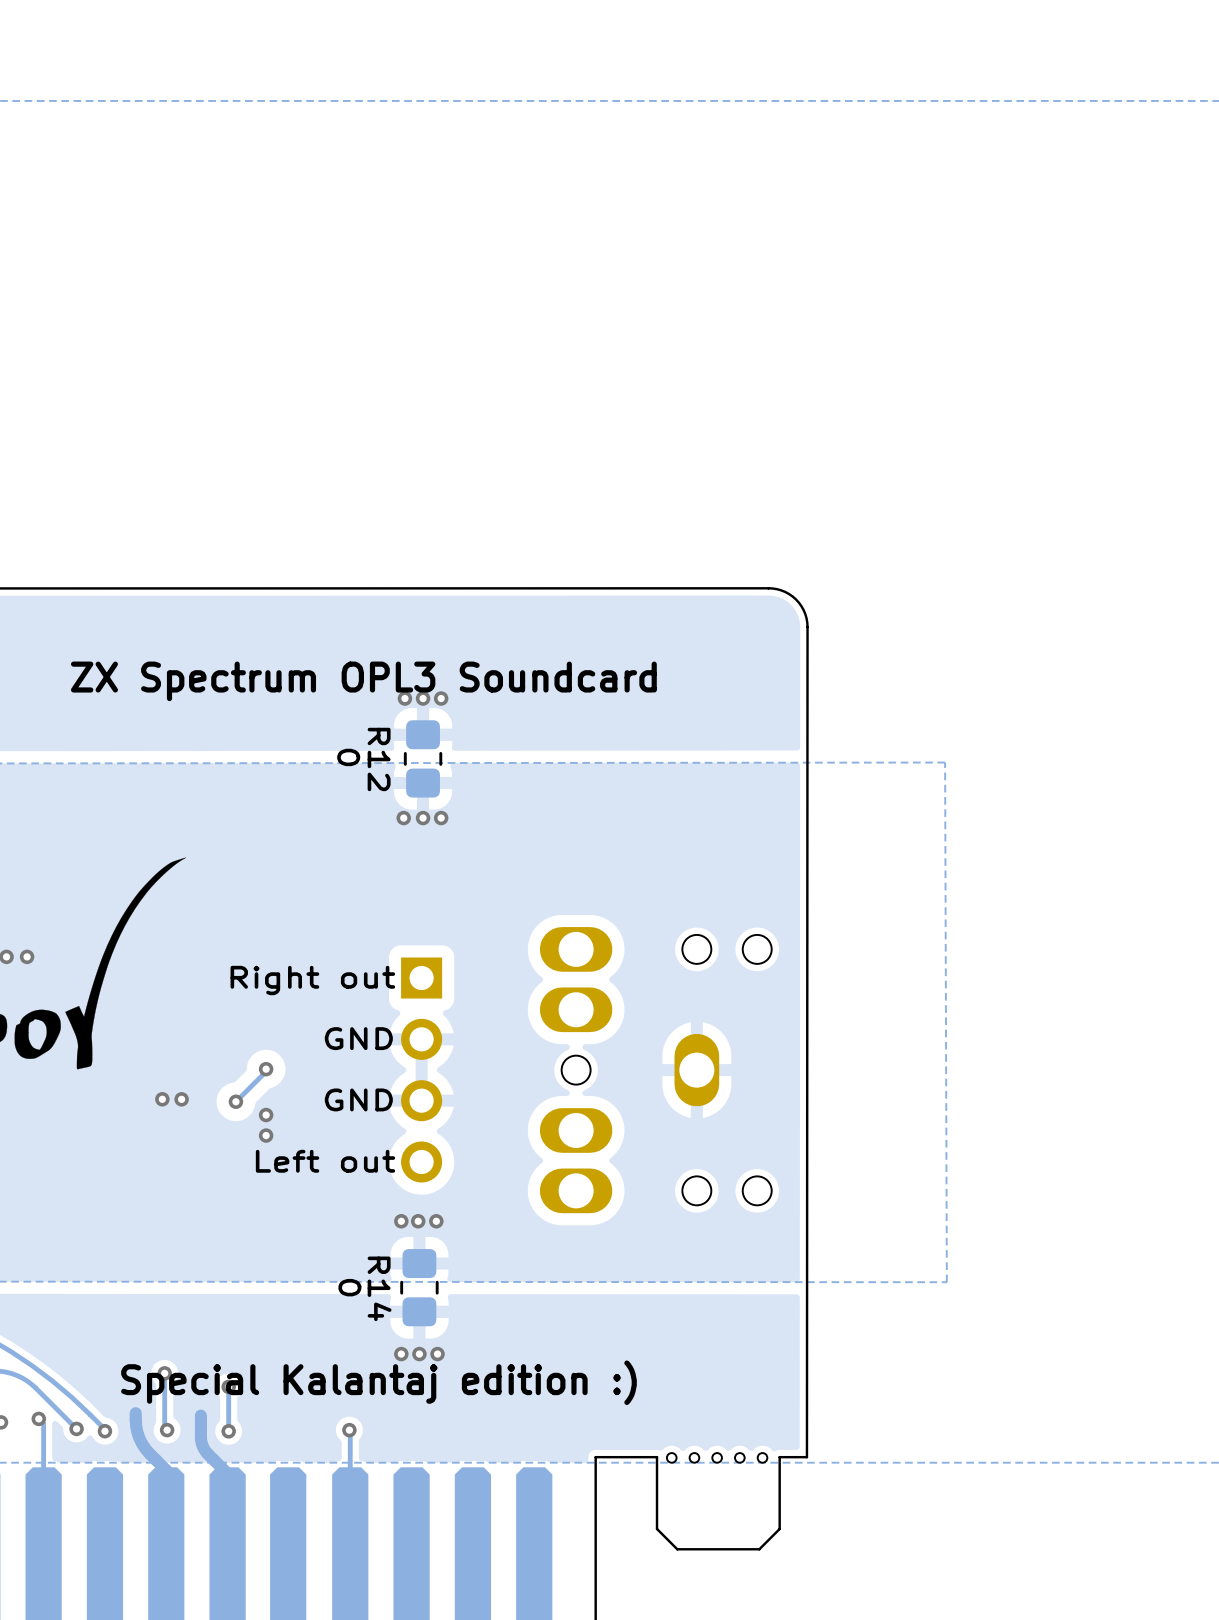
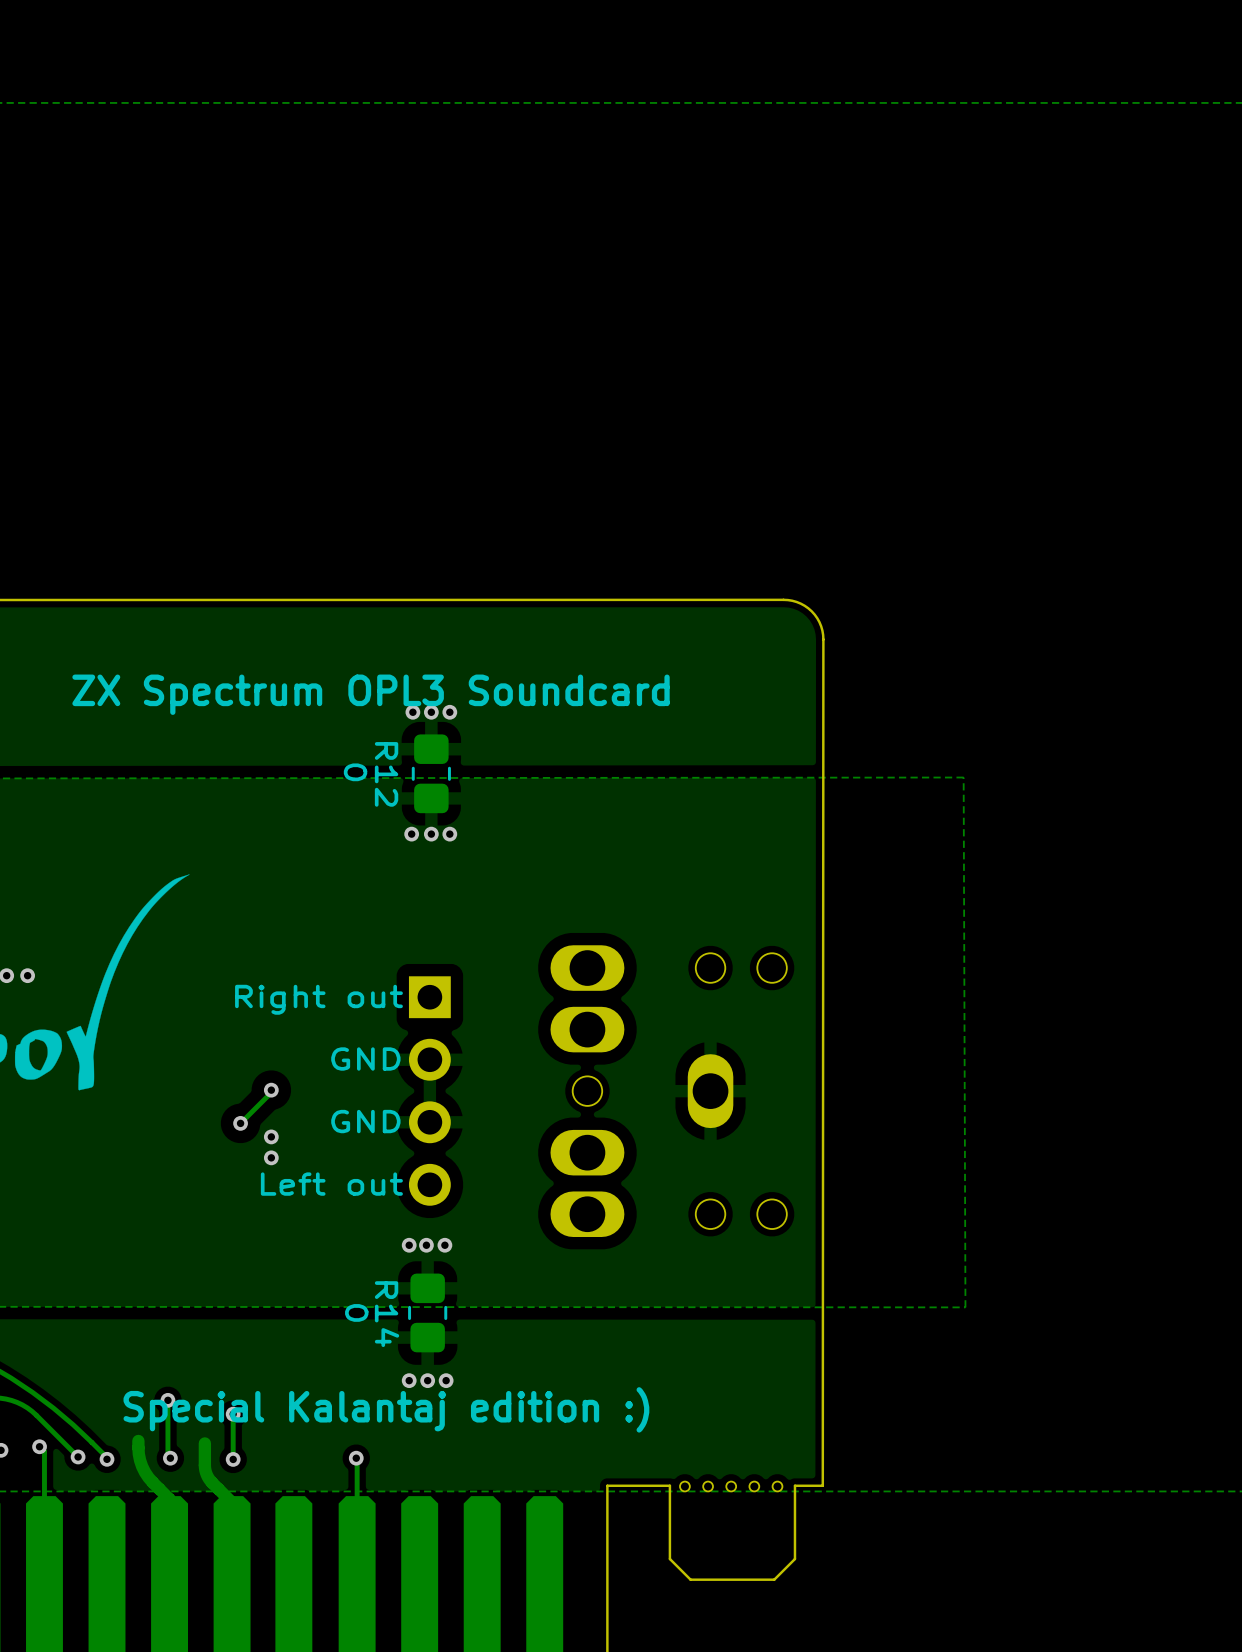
via: (162, 1099) -> none
via: (181, 1099) -> none

